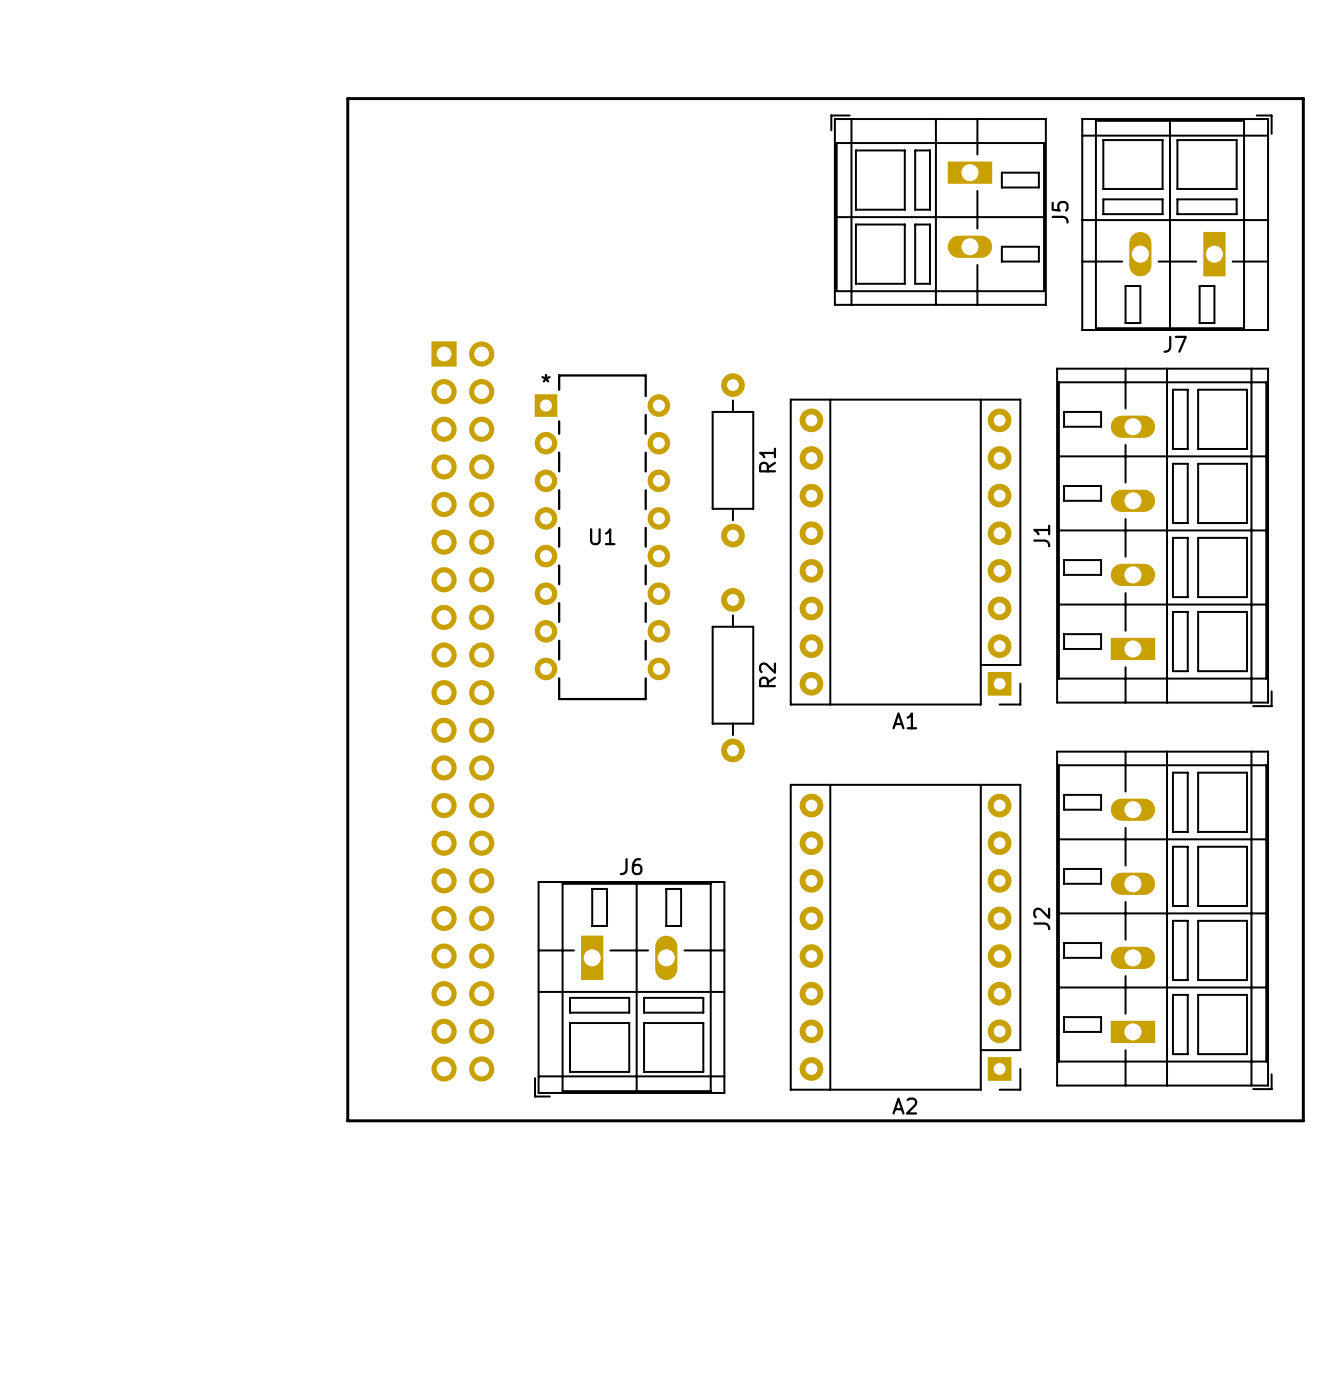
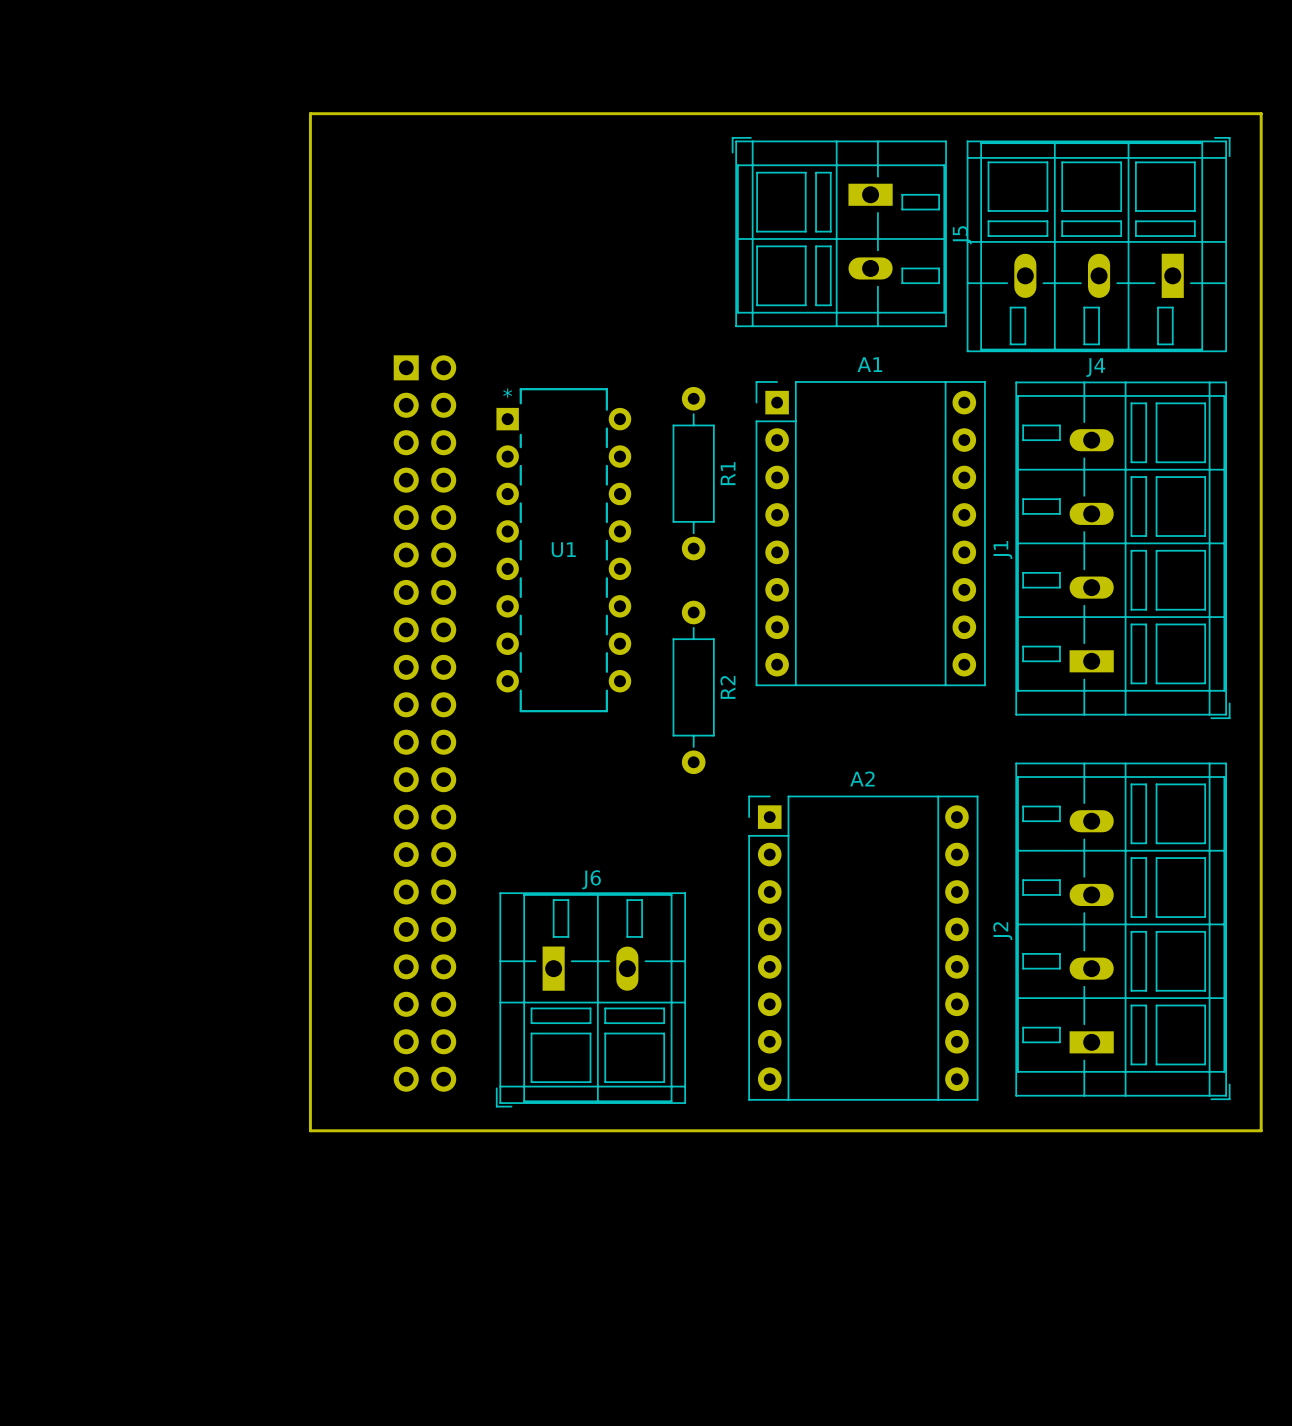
J5 position: (938, 210) -> (839, 232)
J7: (1176, 222) -> none
J4: none -> (1098, 244)
A1 rotation: 0° (905, 552) -> 180° (870, 533)
A2 rotation: 0° (905, 937) -> 180° (863, 948)

